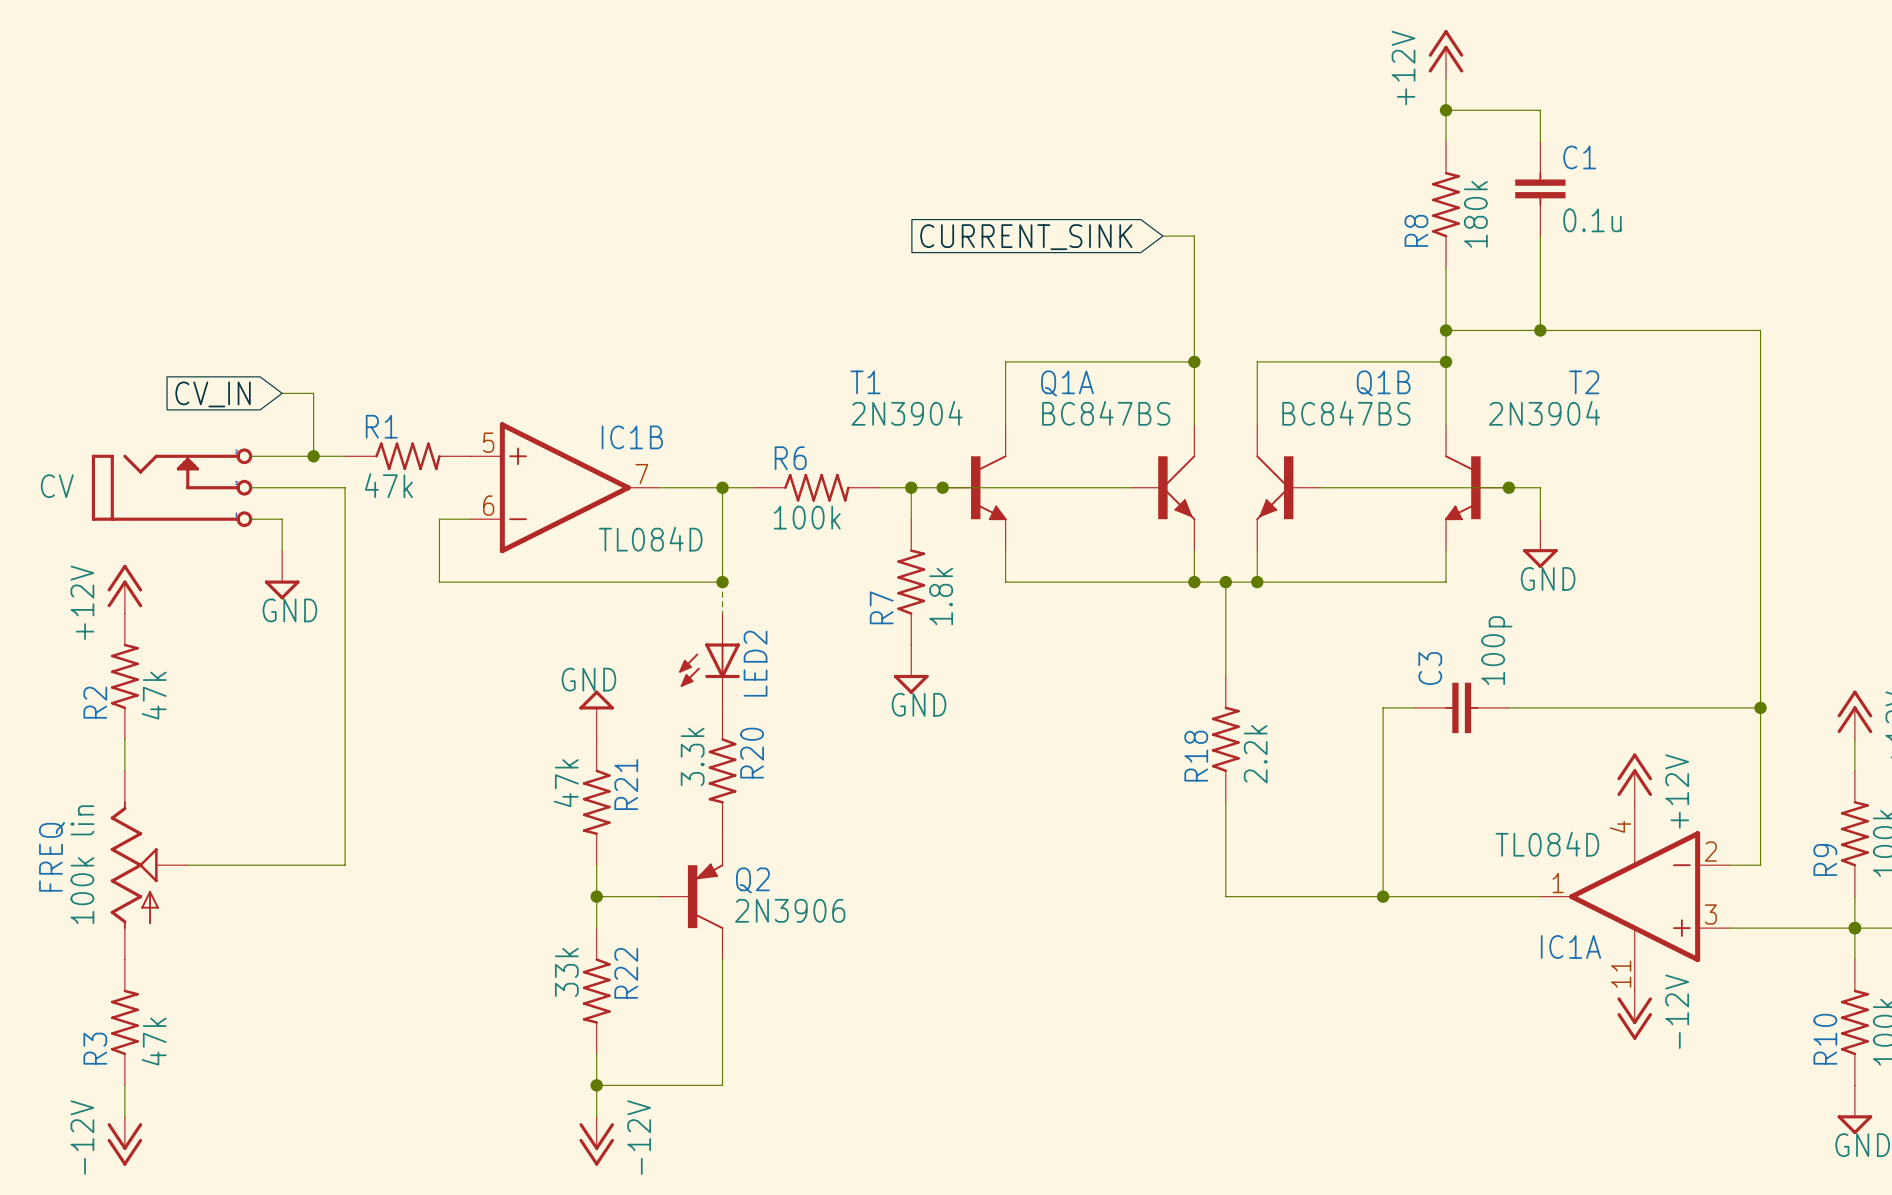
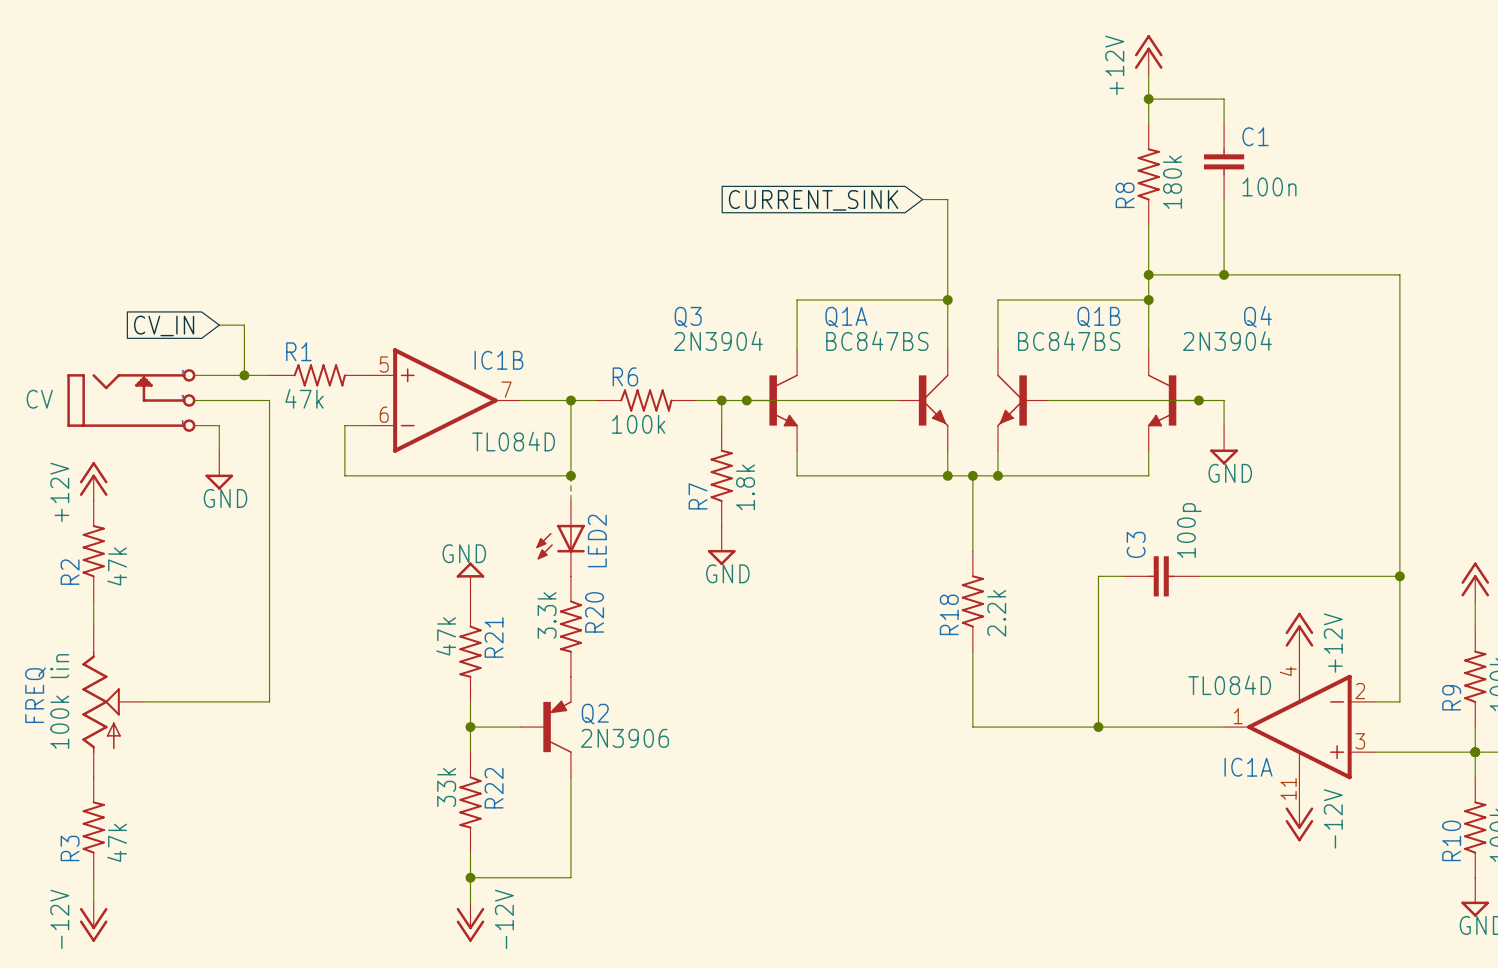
C1 value: 0.1u (1592, 220) -> 100n (1269, 186)
T1 name: T1 (865, 382) -> Q3 (688, 317)
T2 name: T2 (1584, 382) -> Q4 (1257, 316)

